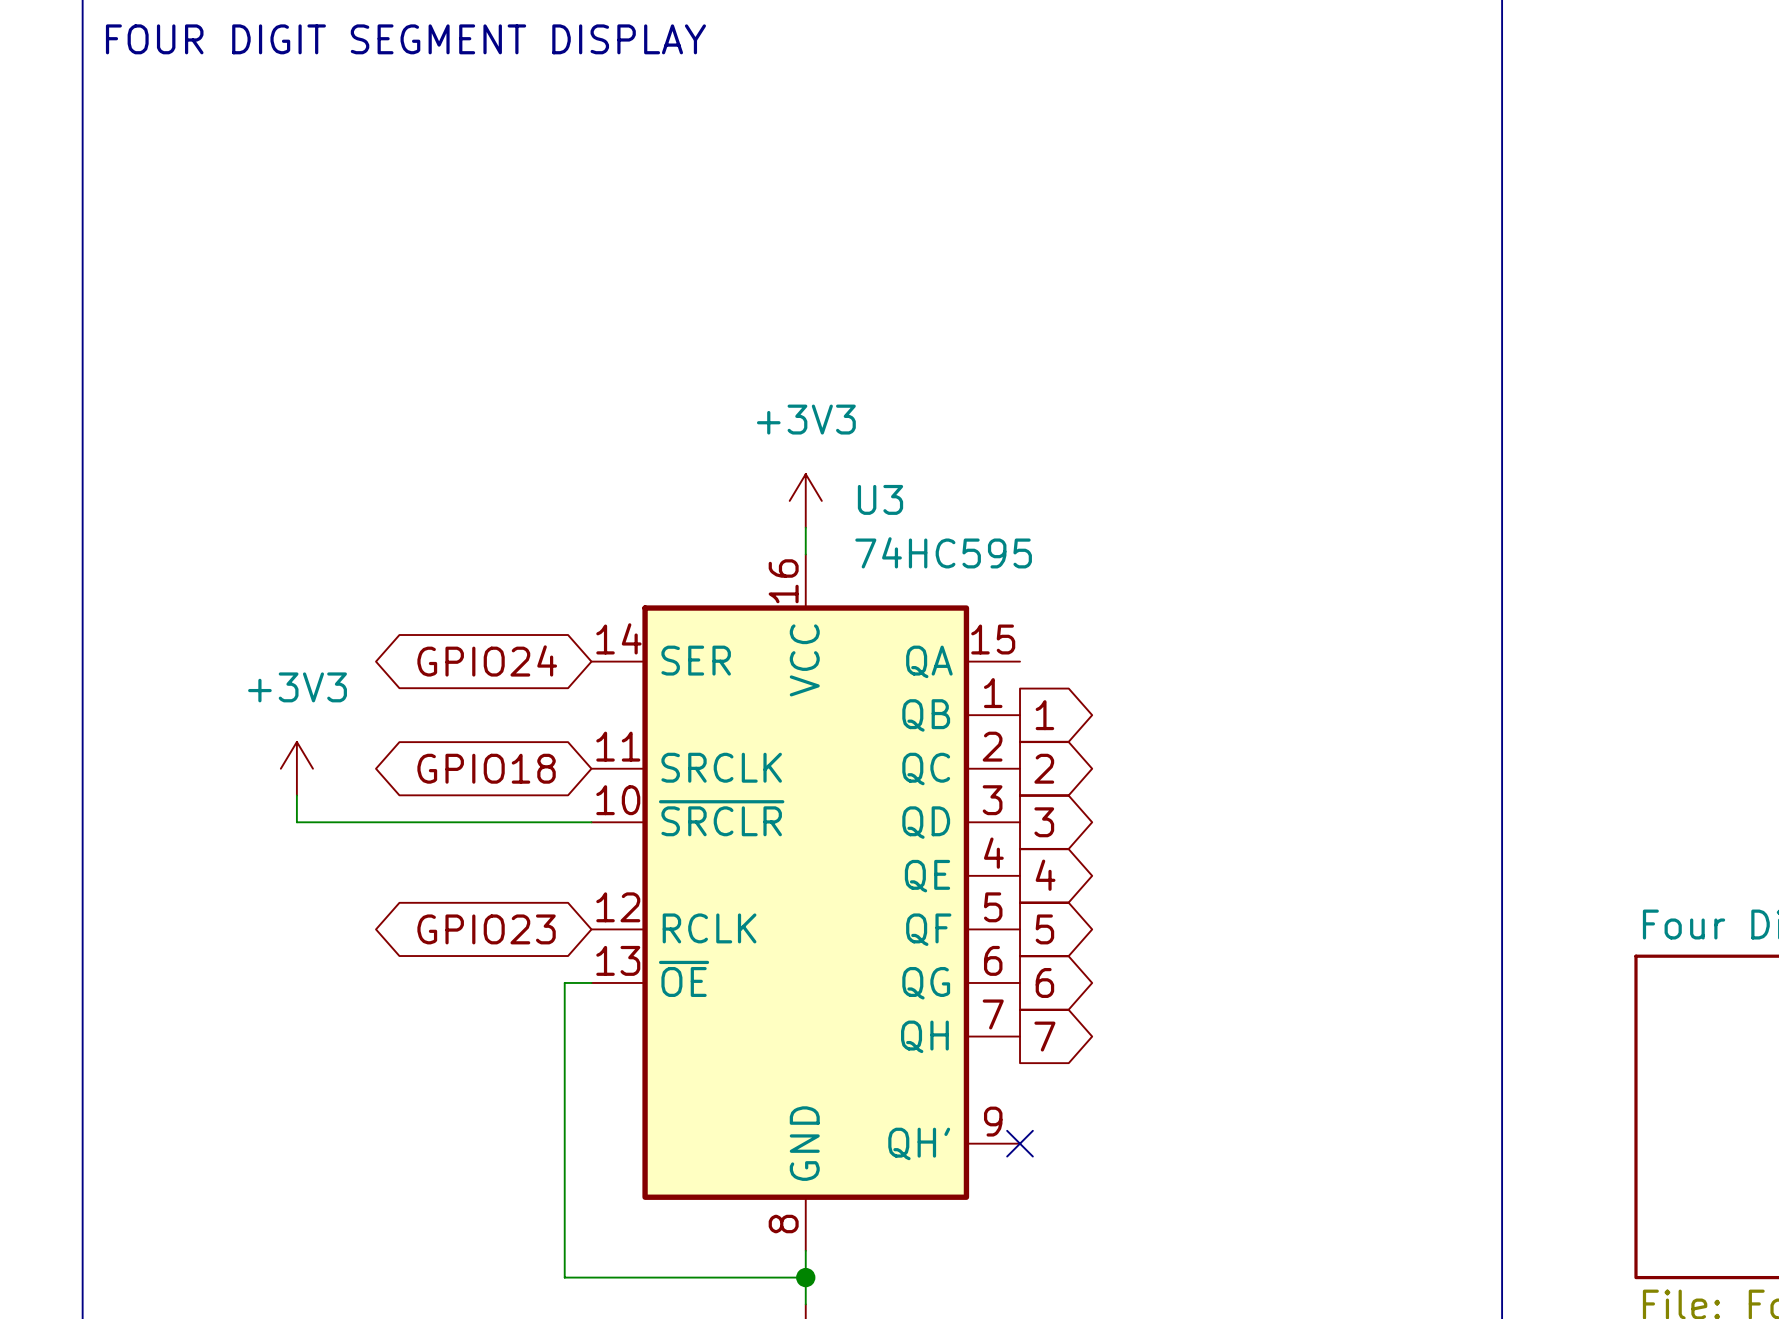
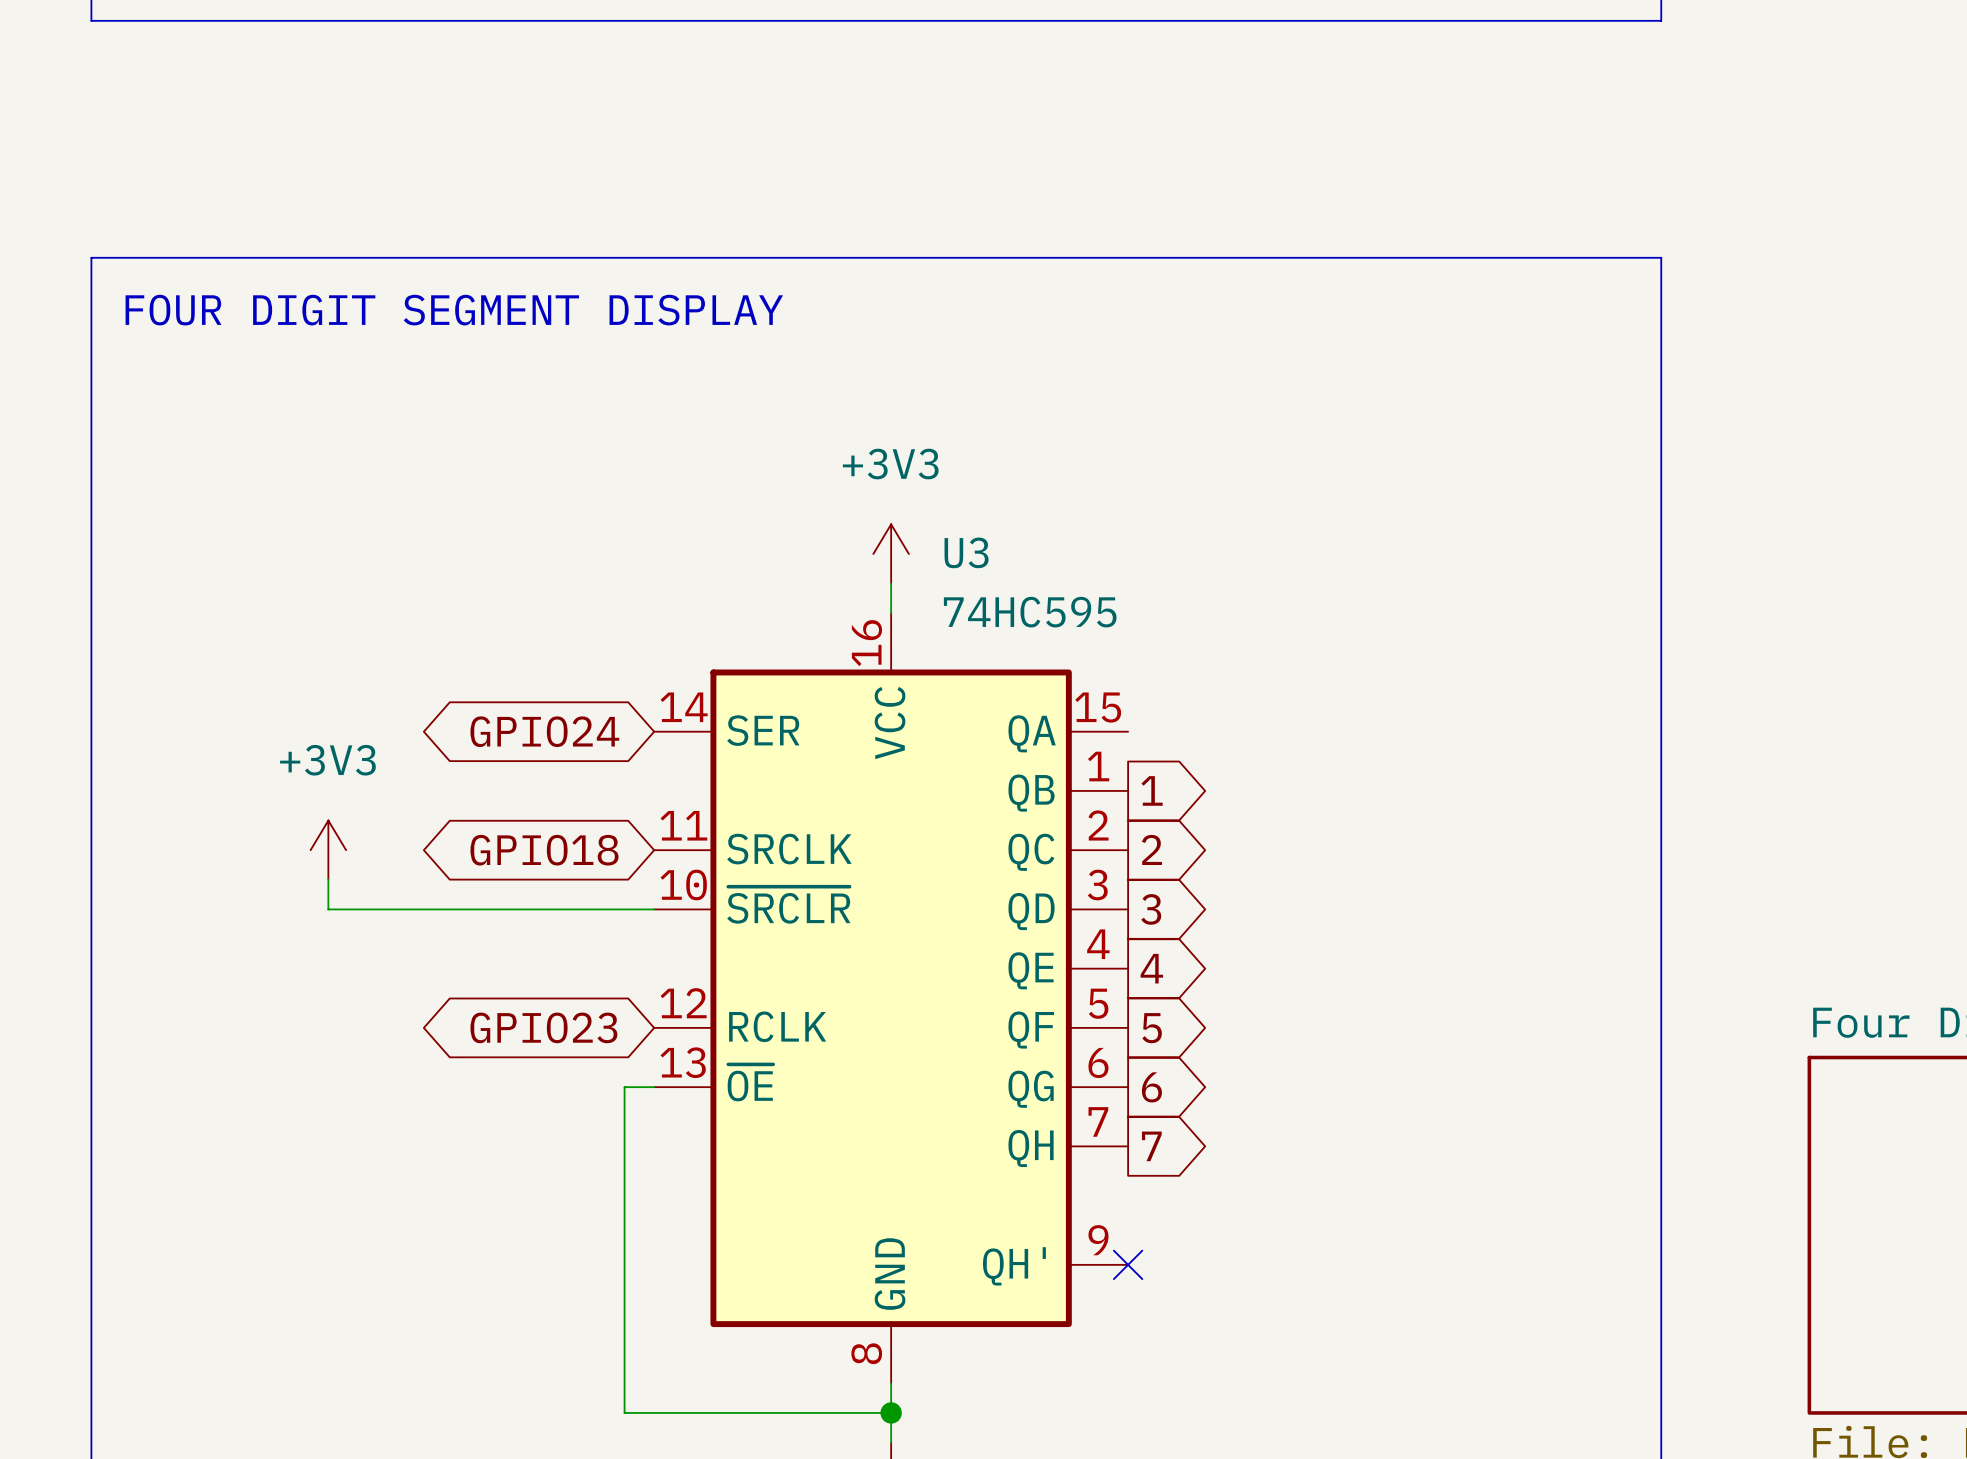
line: (82, 18) (82, 233) -> (91, 20) (1661, 20)
line: (1502, 18) (1502, 233) -> (91, 257) (1661, 257)
text position: FOUR DIGIT SEGMENT DISPLAY (405, 39) -> FOUR DIGIT SEGMENT DISPLAY (454, 310)

